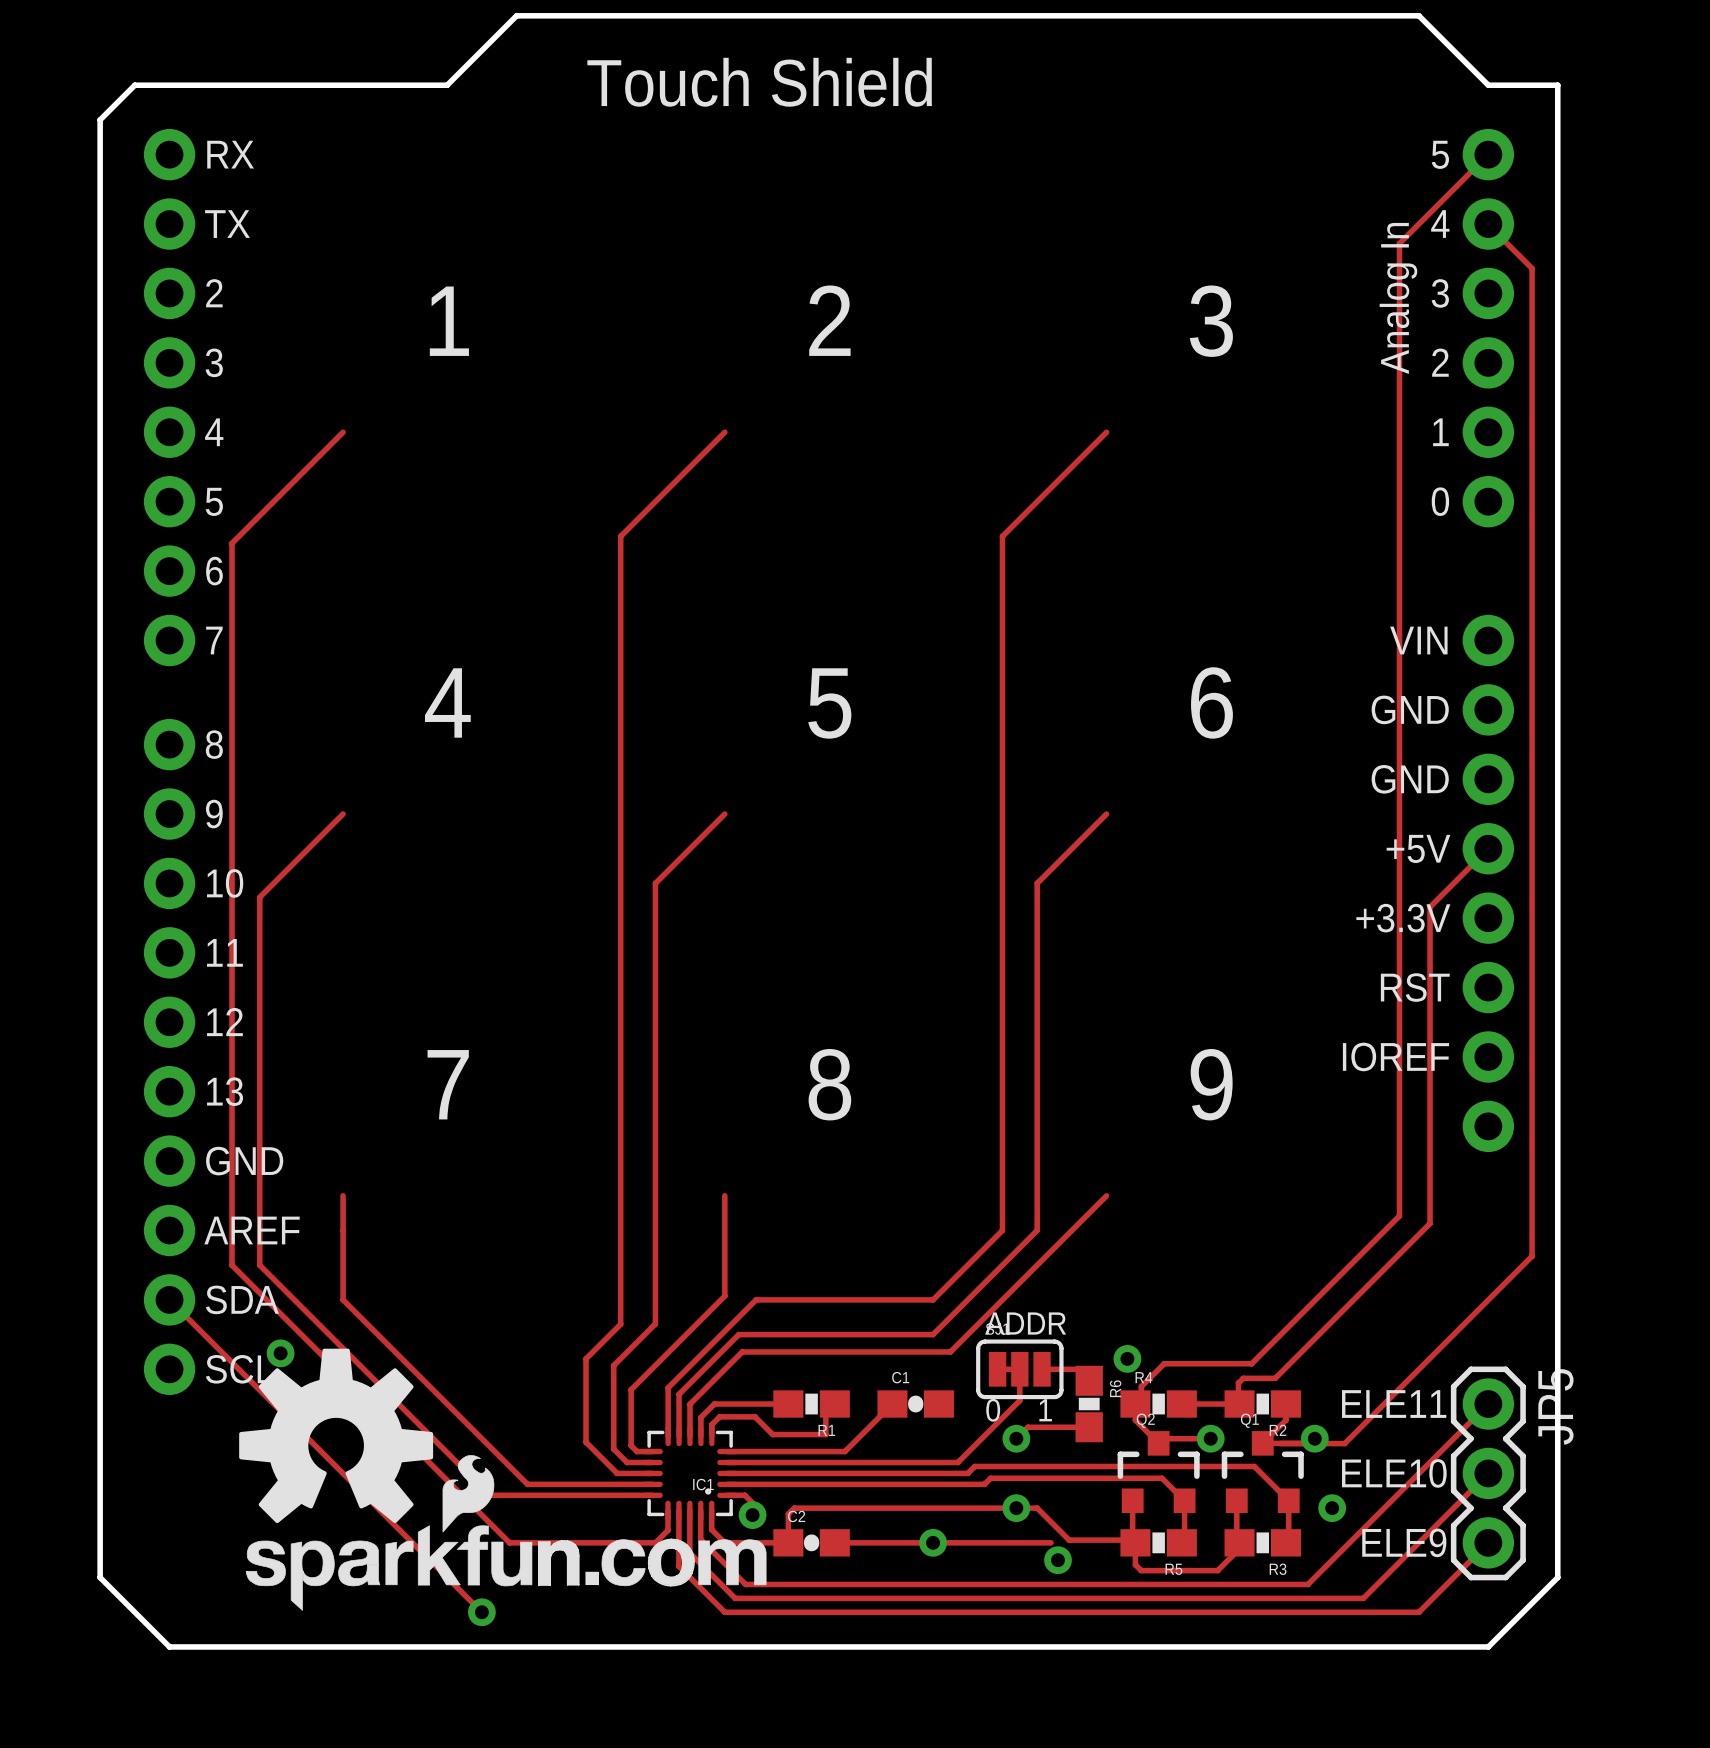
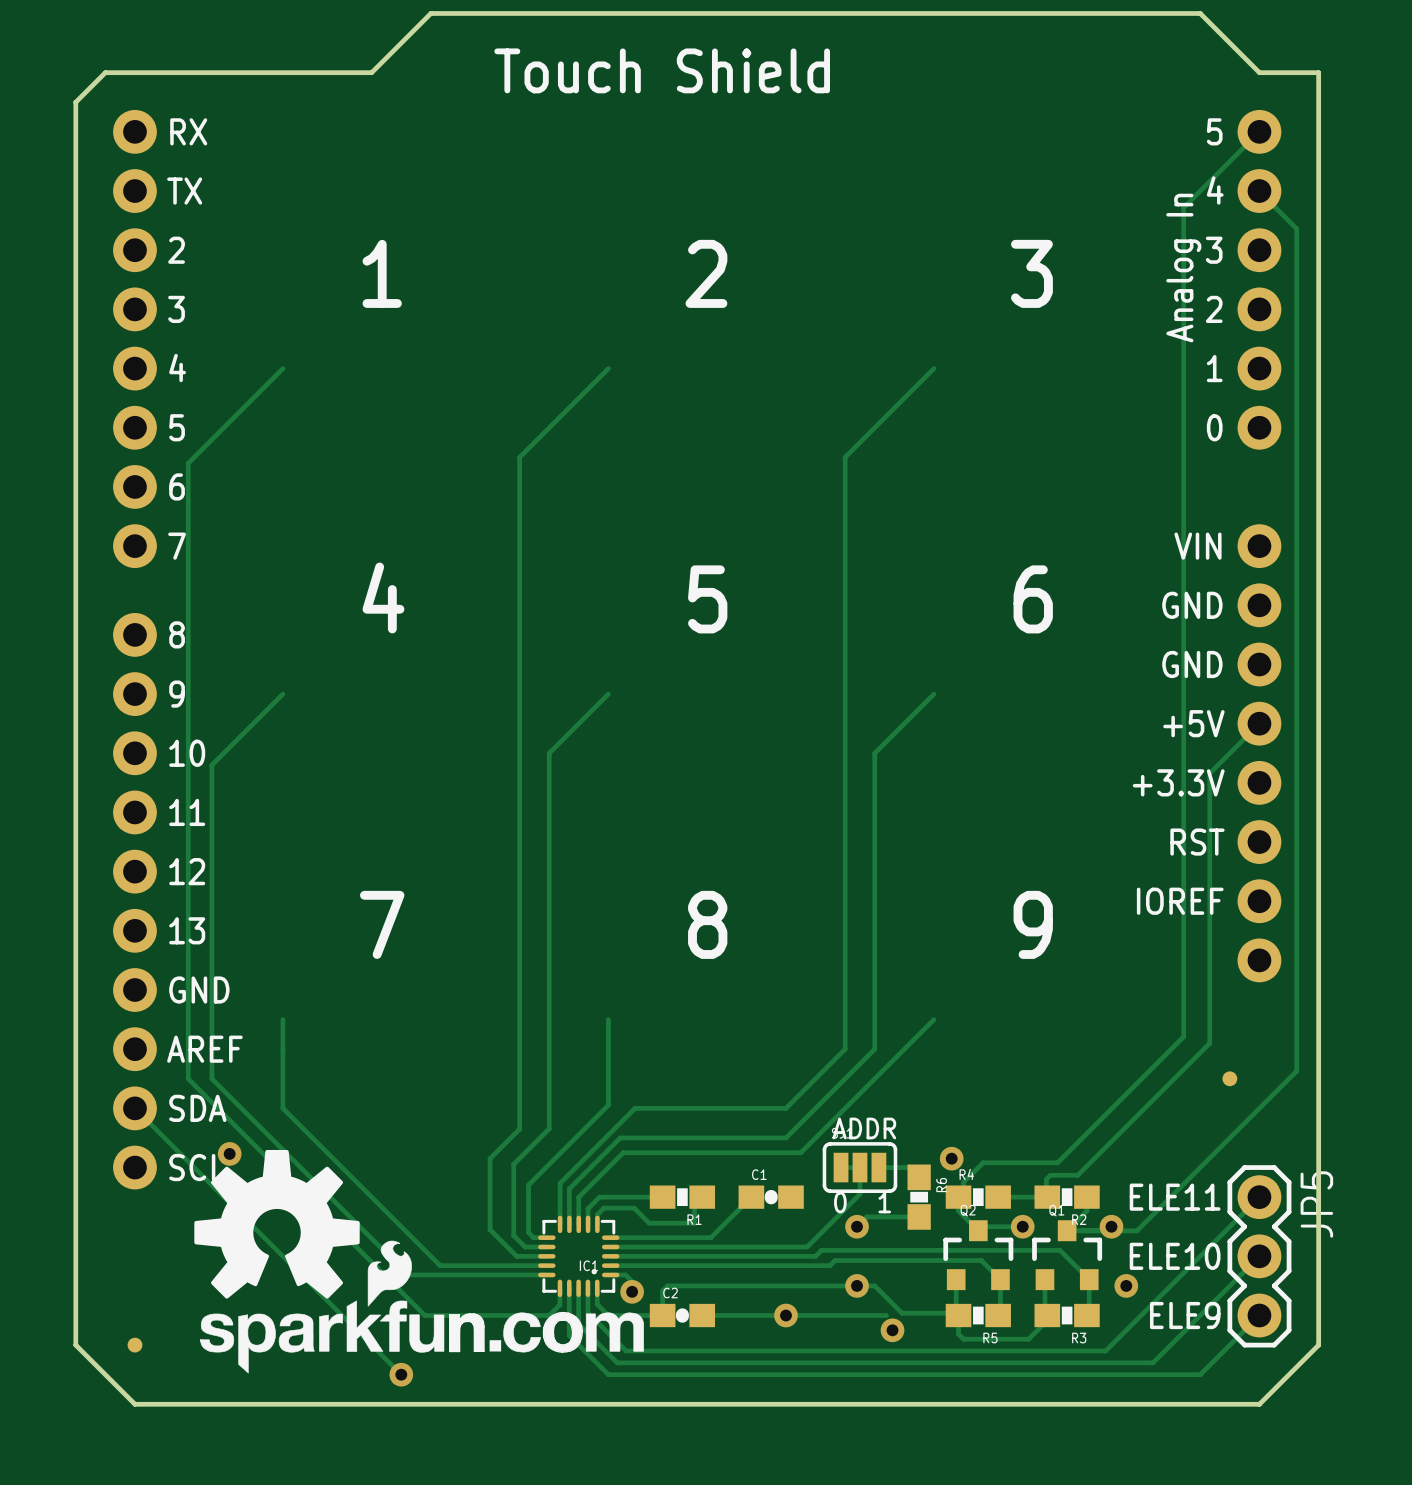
part: none -> (1229, 1078)
part: none -> (134, 1345)

